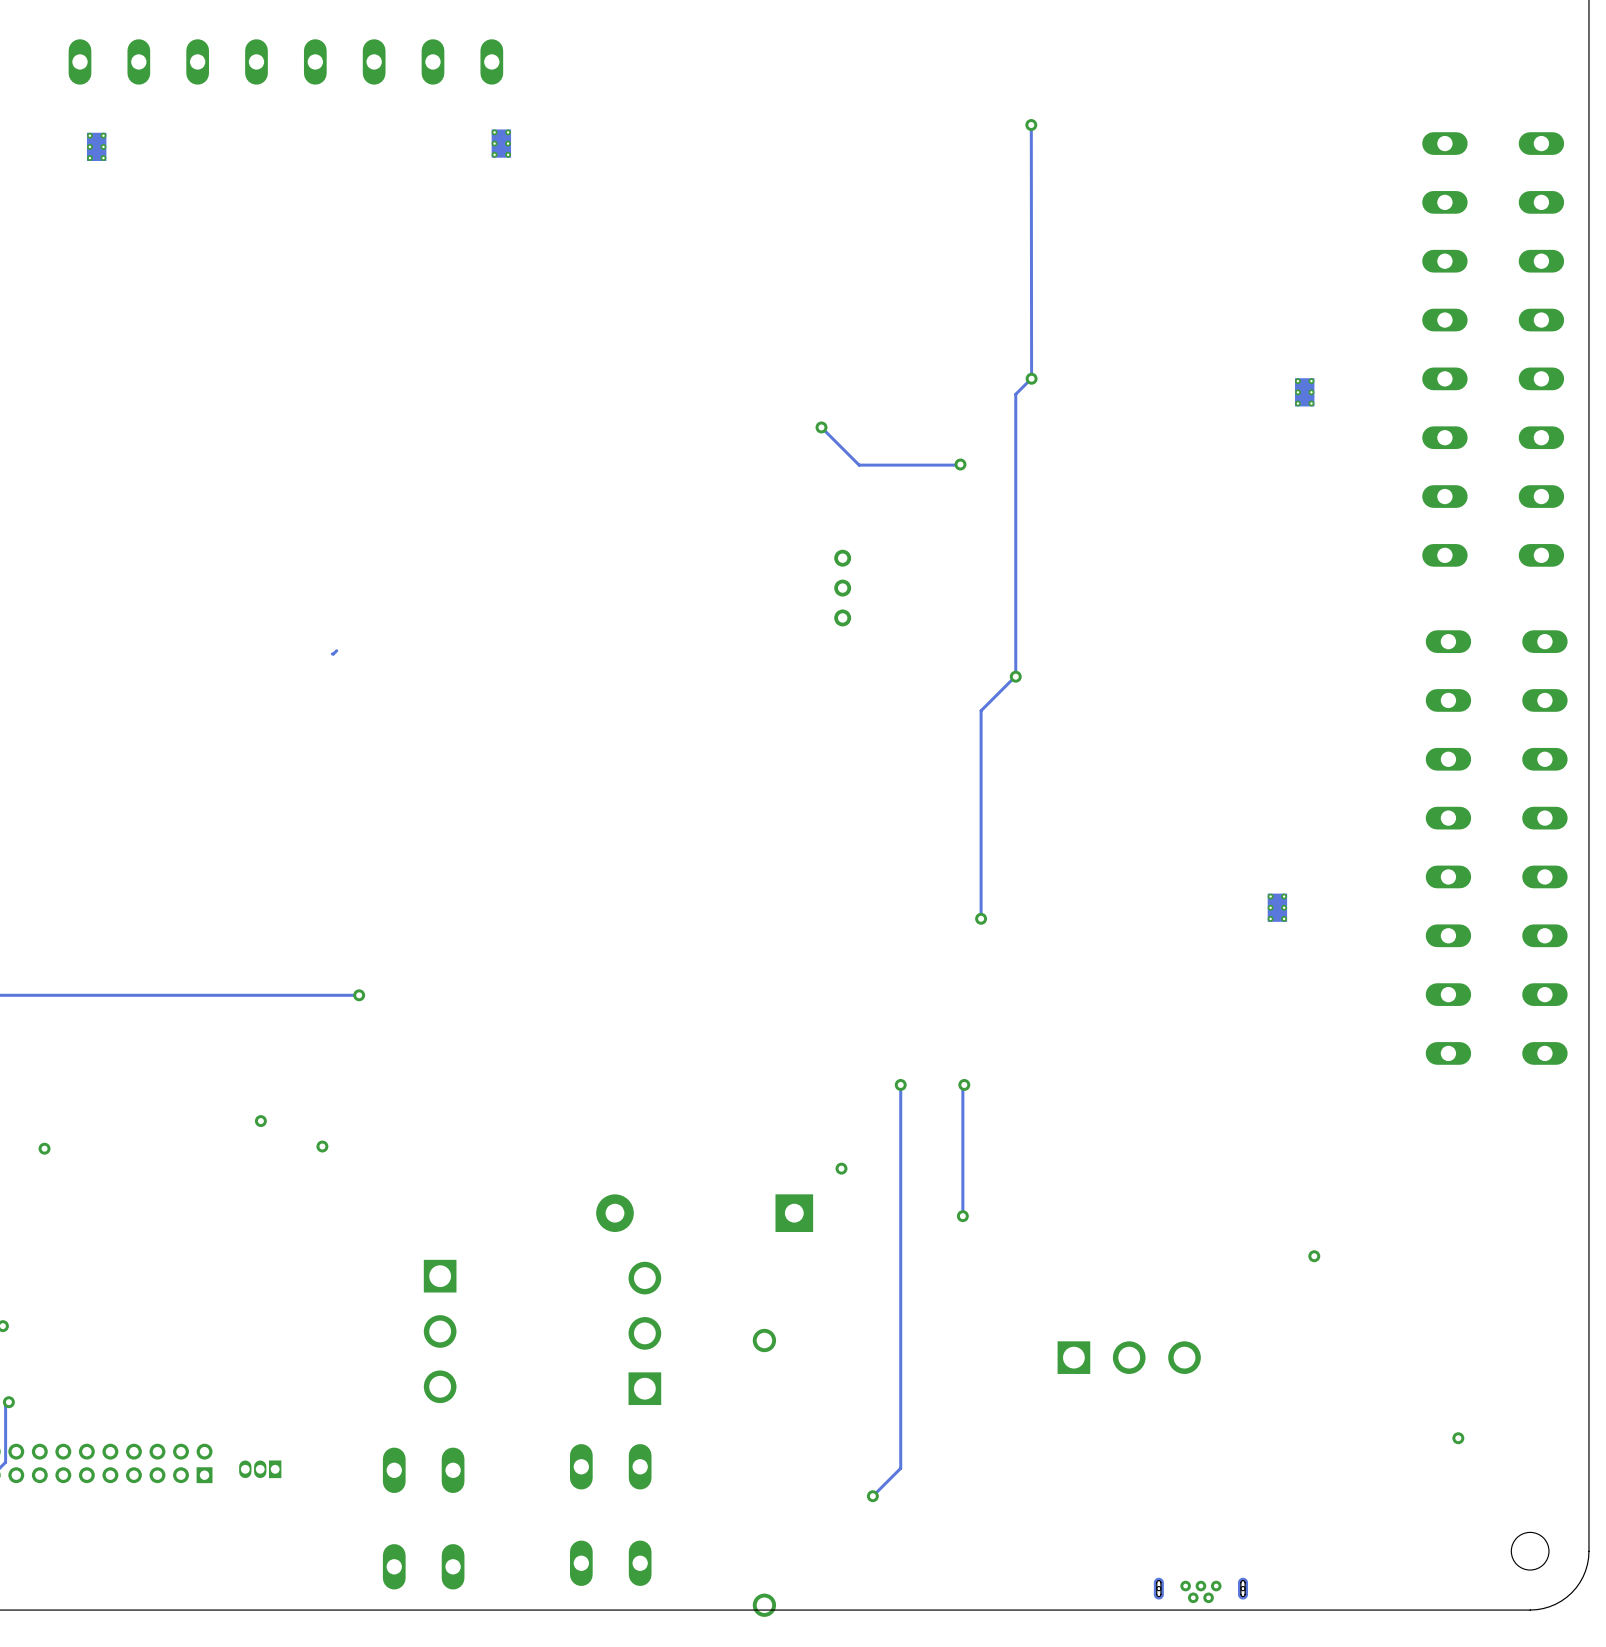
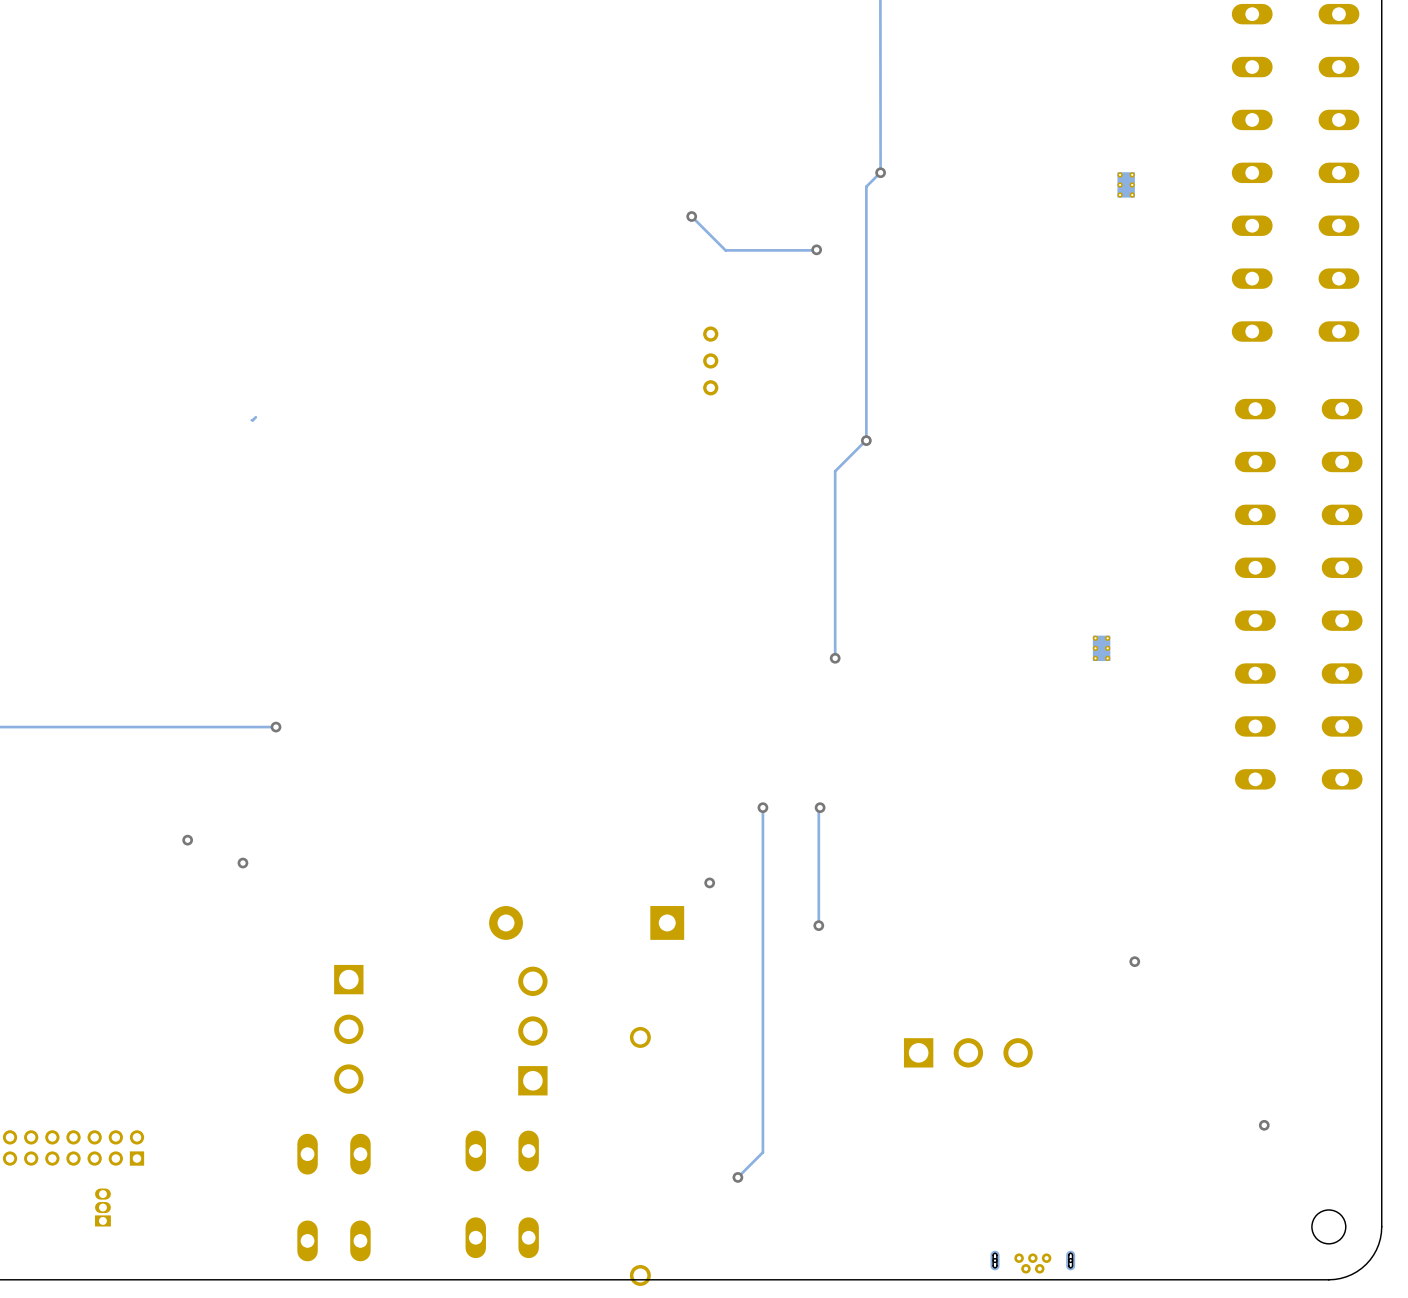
part rotation: 0° (260, 1469) -> 90° clockwise (102, 1207)
part position: (260, 1469) -> (102, 1207)

